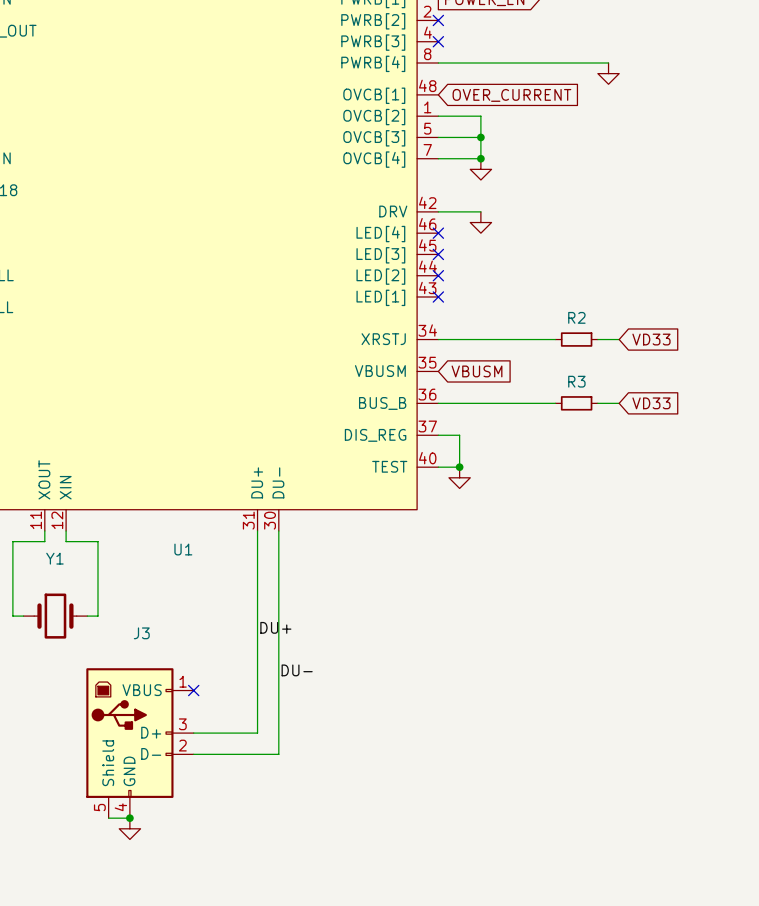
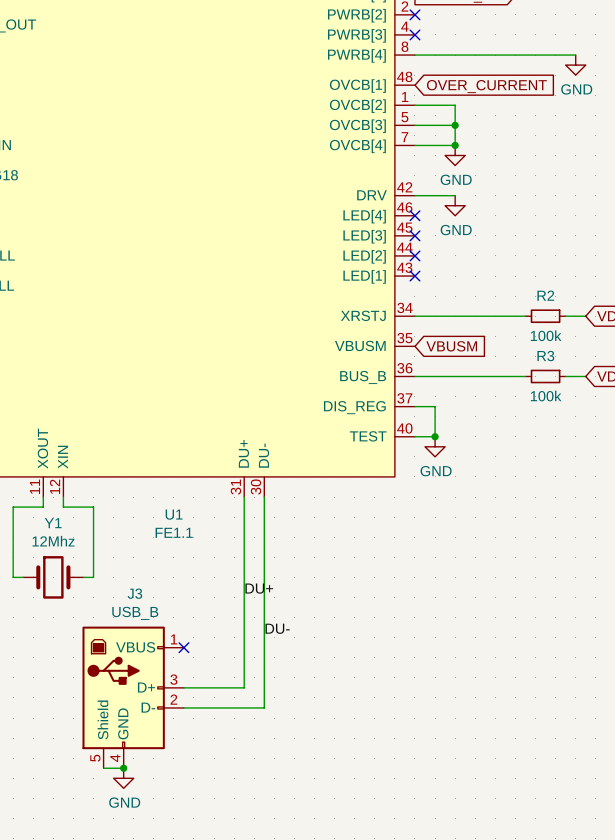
power symbol text: none -> GND (576, 89)
power symbol text: none -> GND (456, 179)
power symbol text: none -> GND (456, 230)
R2 value: none -> 100k (546, 335)
R3 value: none -> 100k (546, 396)
power symbol text: none -> GND (436, 471)
U1 value: none -> FE1.1 (174, 532)
Y1 value: none -> 12Mhz (53, 541)
J3 value: none -> USB_B (135, 613)
power symbol text: none -> GND (124, 802)

